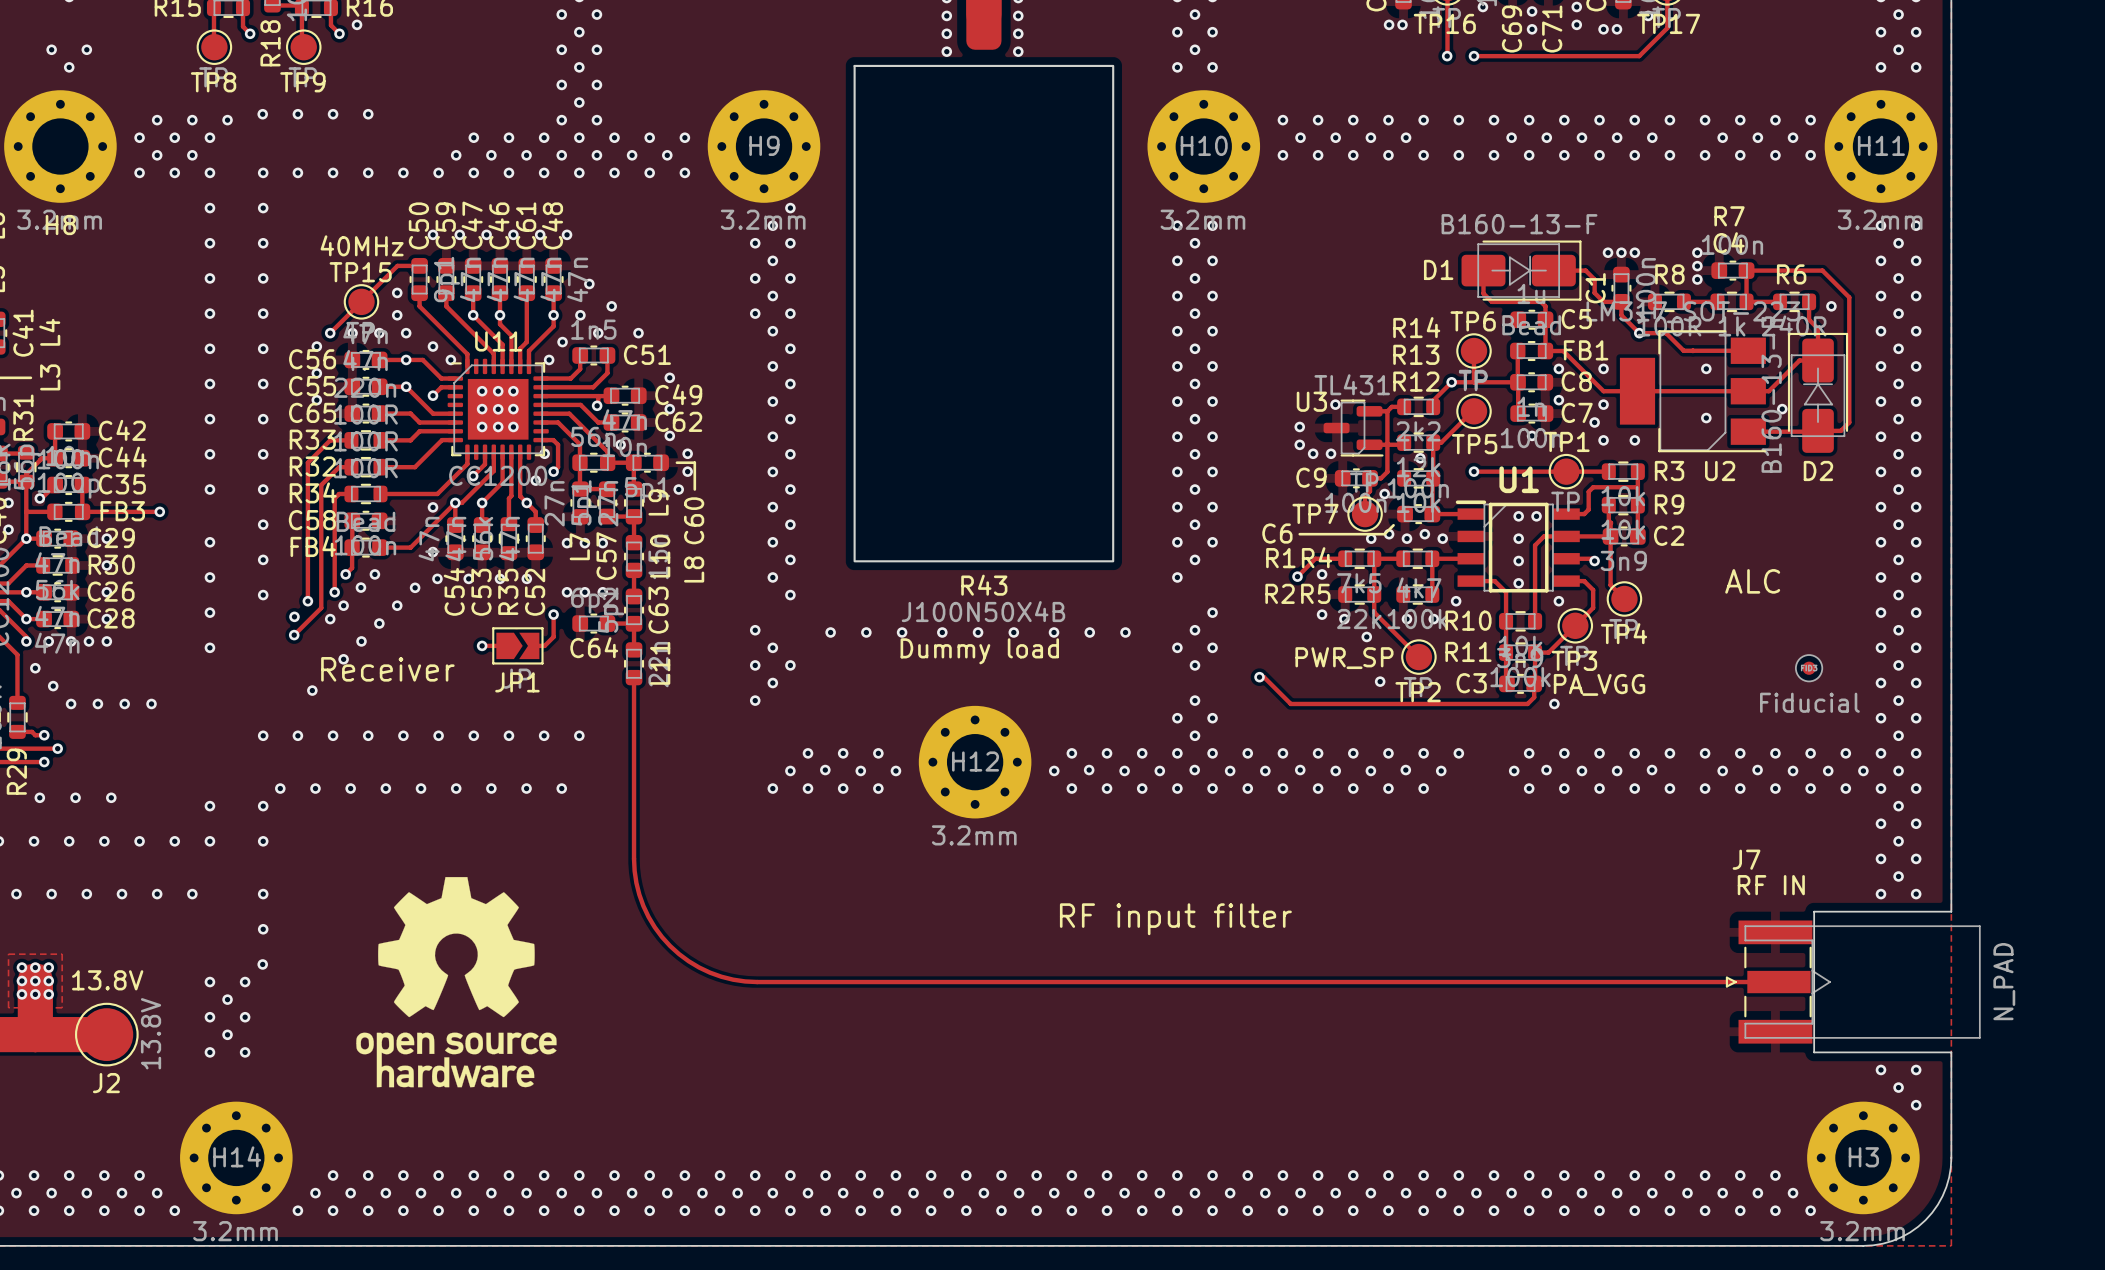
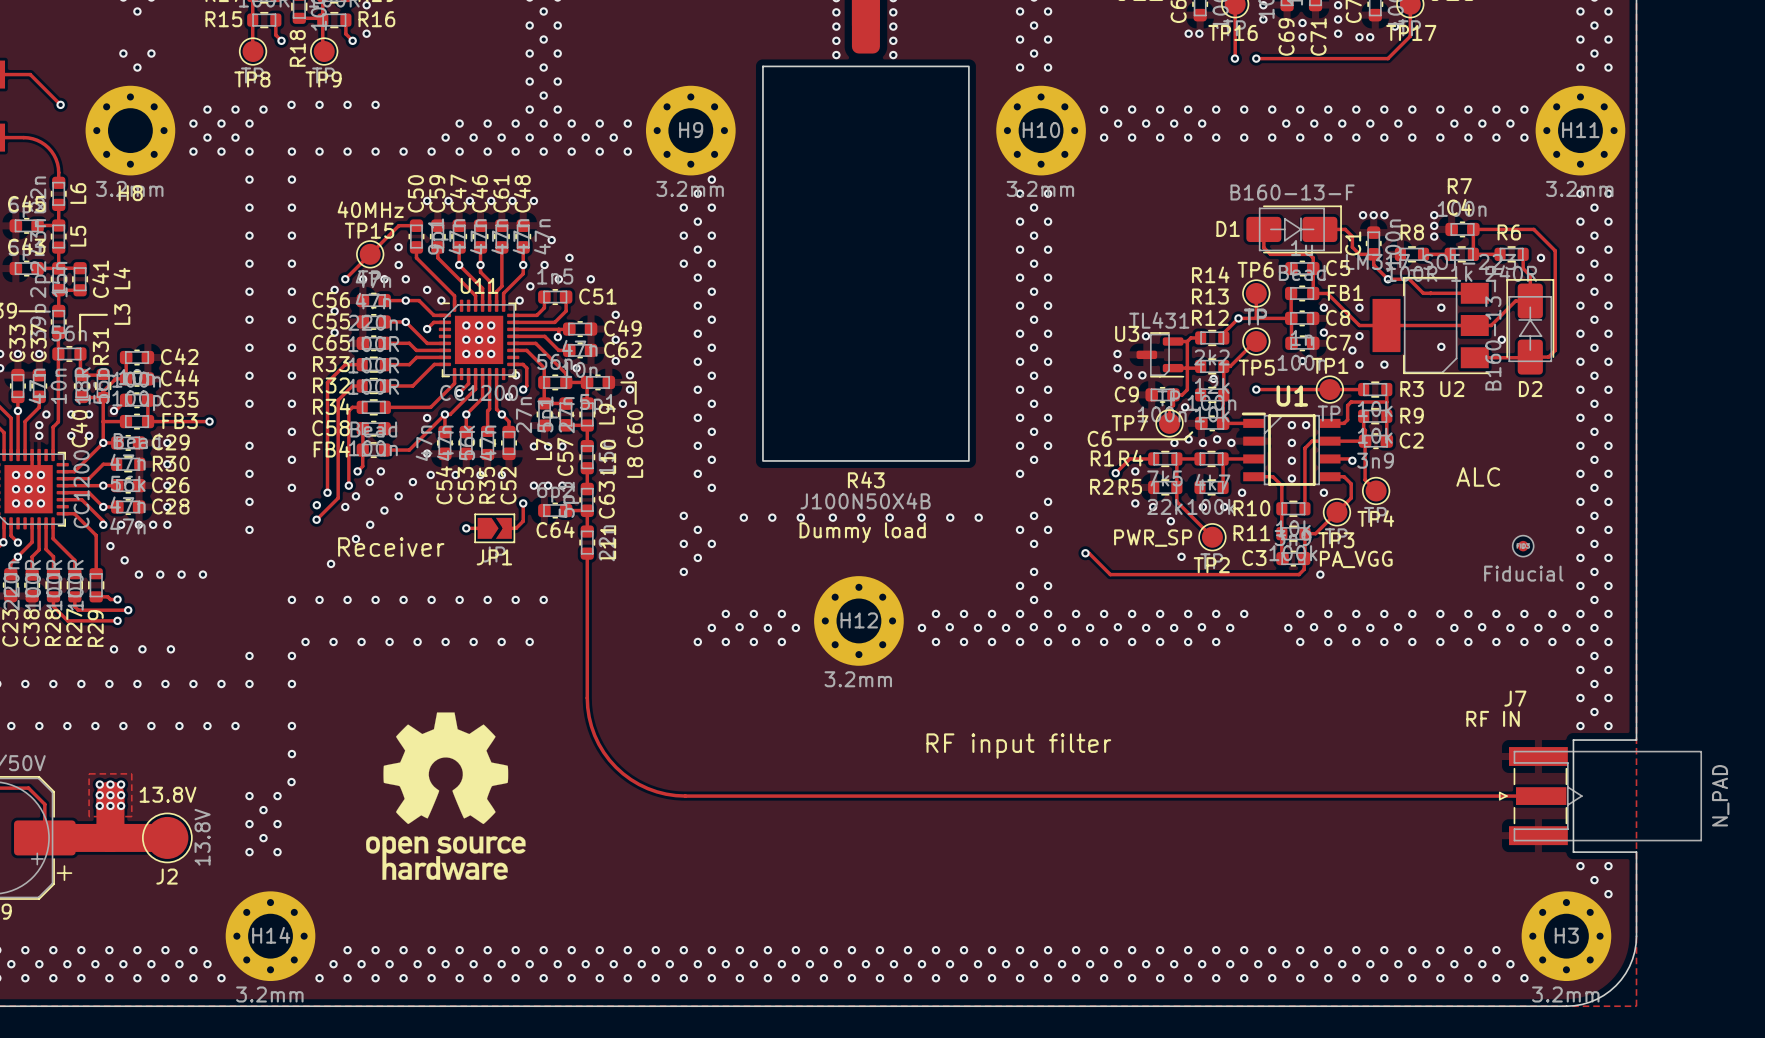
board edge: (1872, 911) (1814, 911) (1814, 1052) (1872, 1052) -> (1573, 740) (1573, 852)
track: none -> (1499, 796) (1517, 796)
J7 position: (1853, 982) -> (1600, 796)

